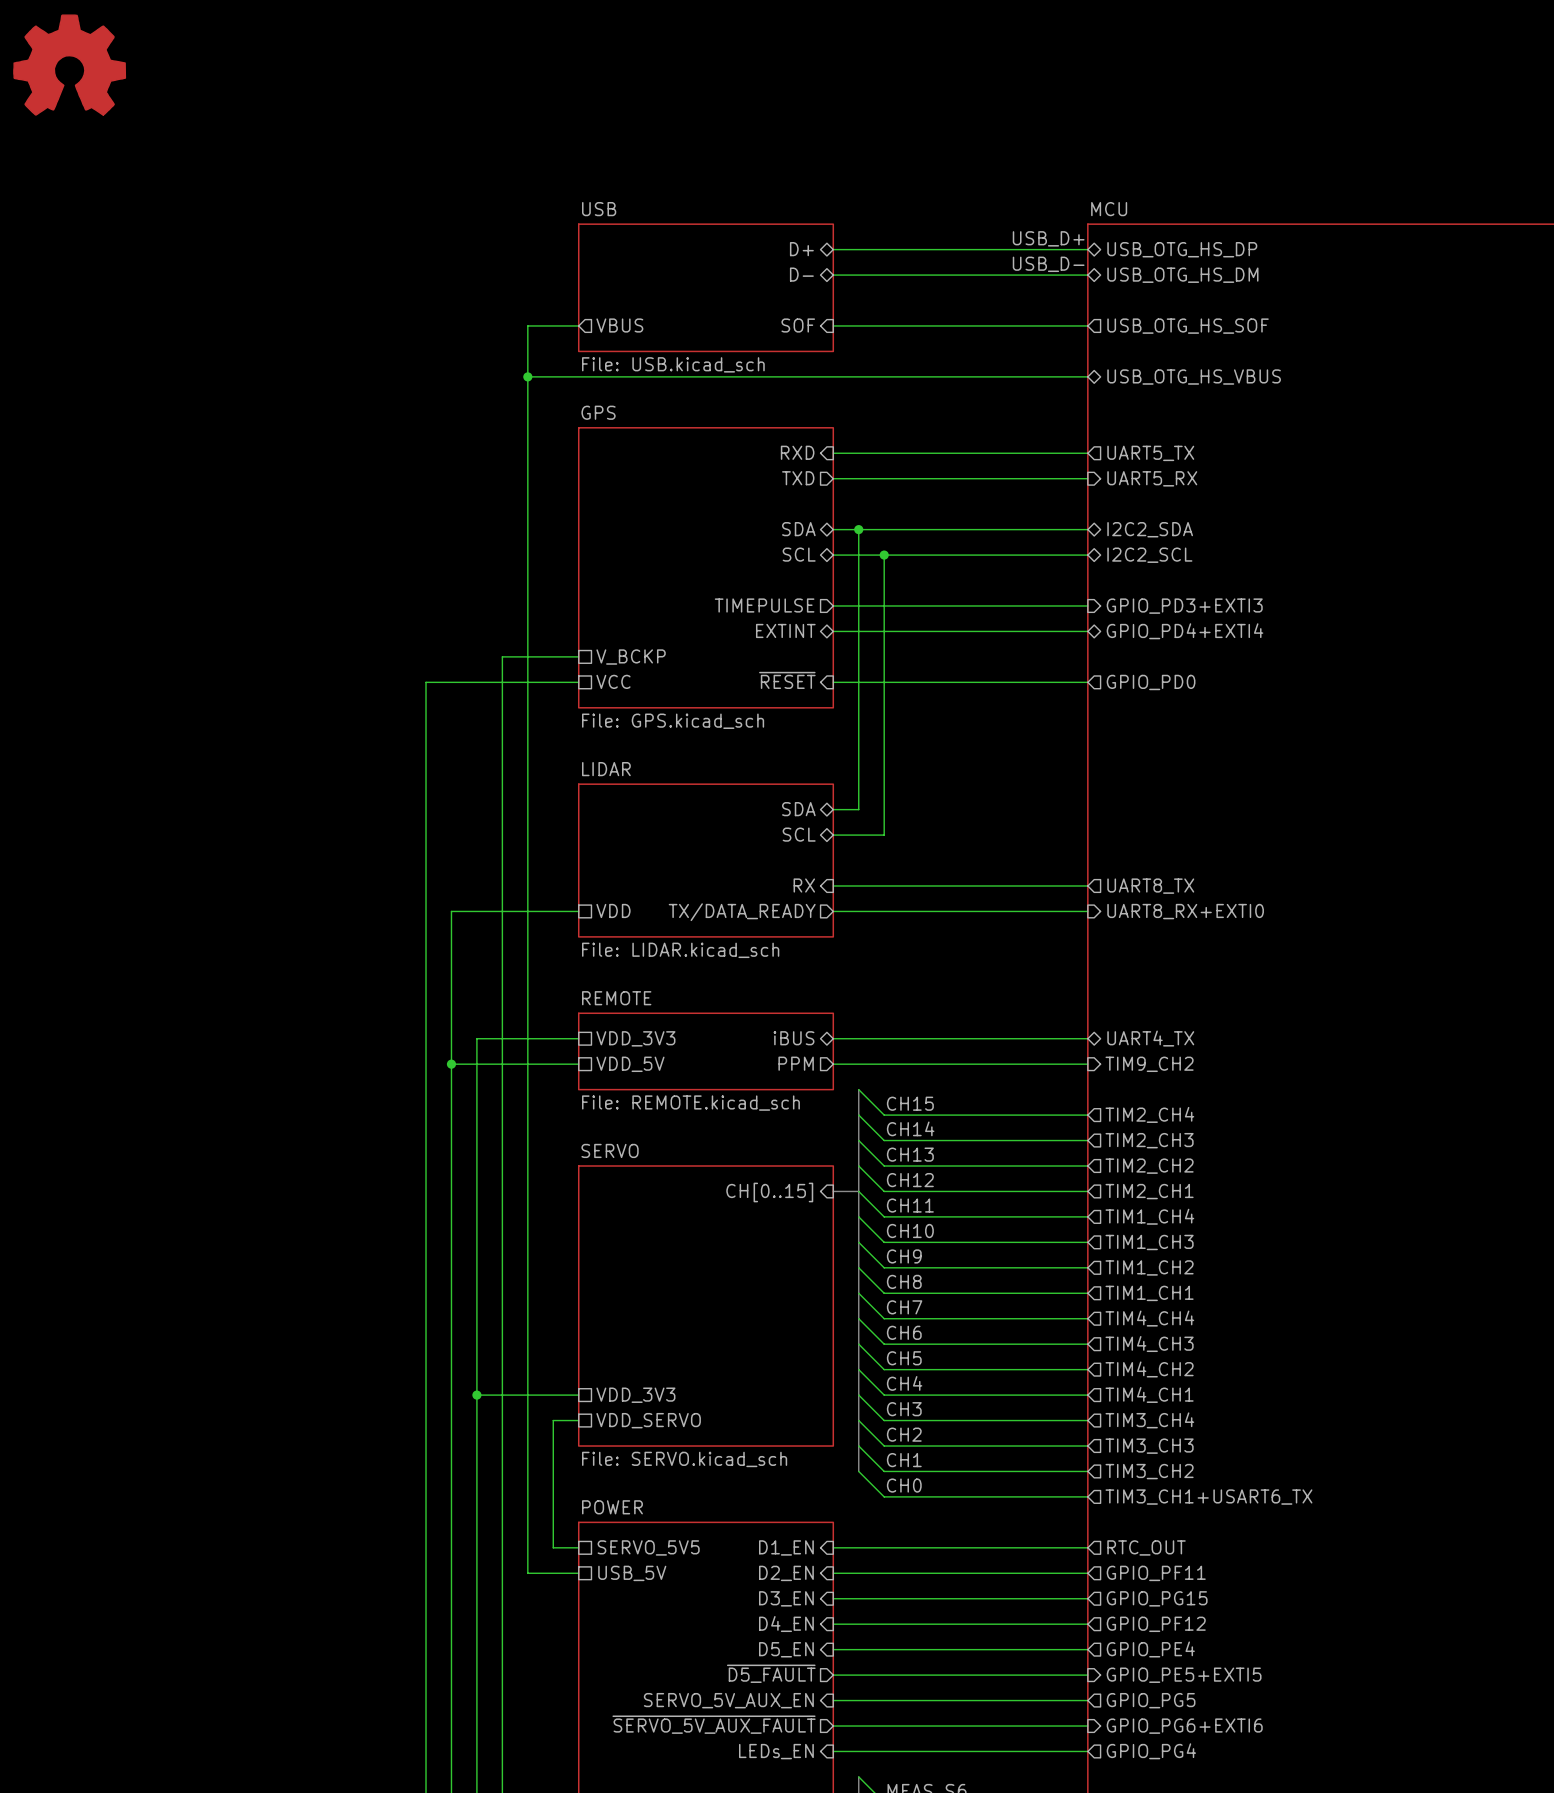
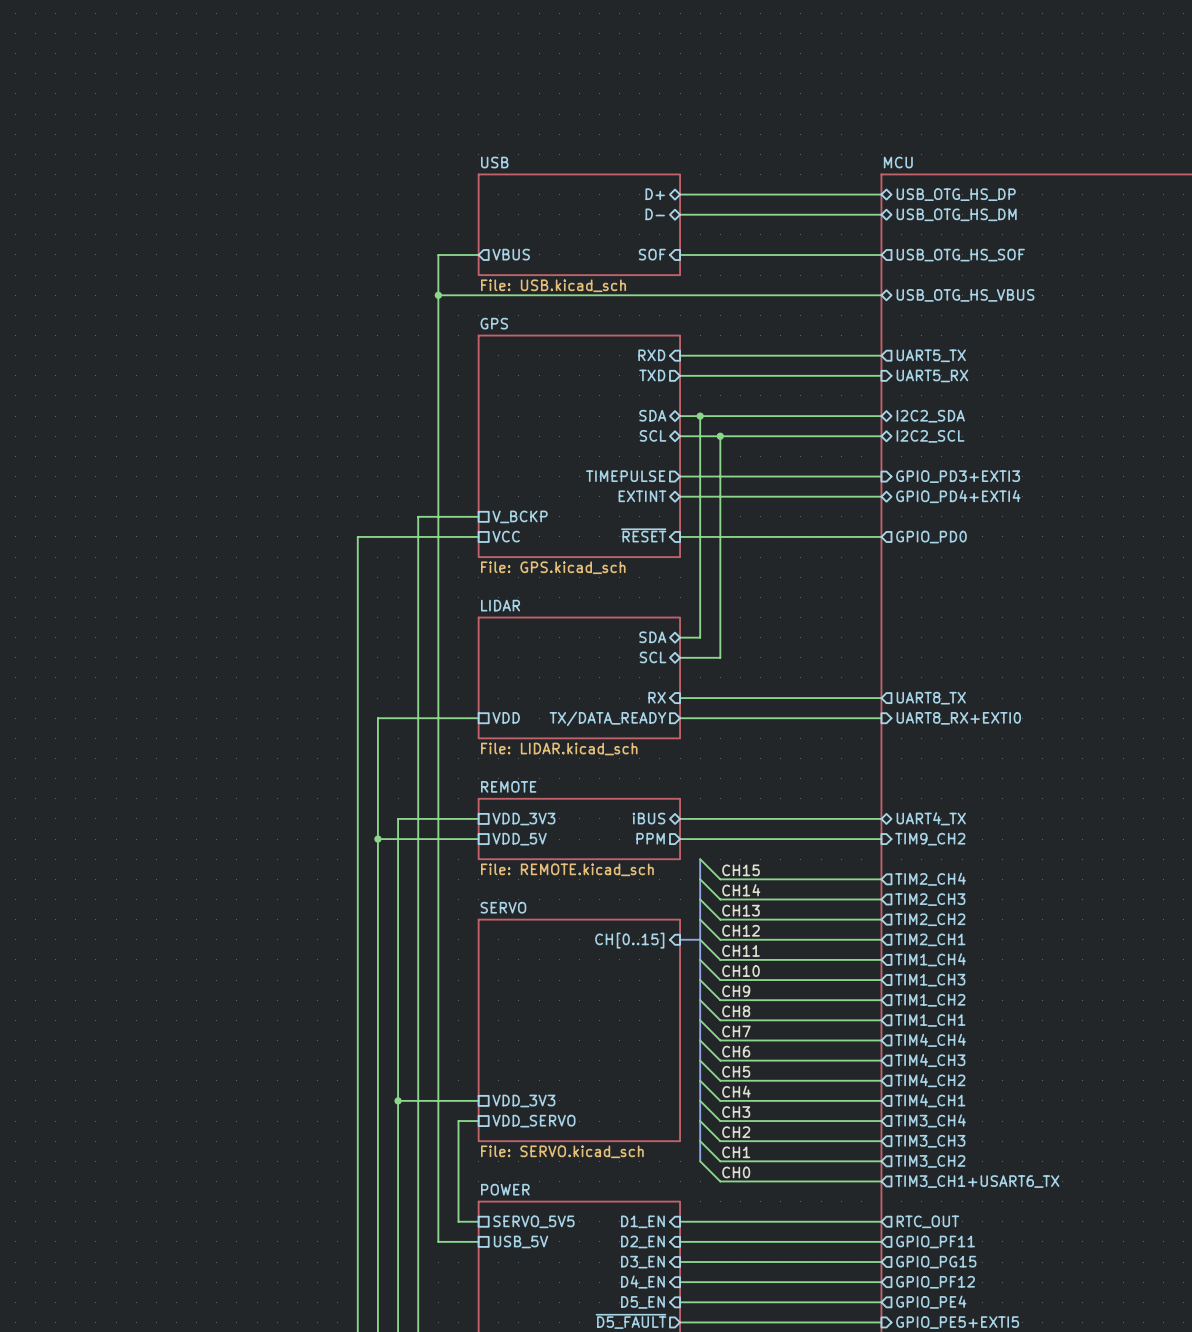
part: (69, 65) -> none
label: USB_D+ (1048, 238) -> none
label: USB_D- (1048, 264) -> none

